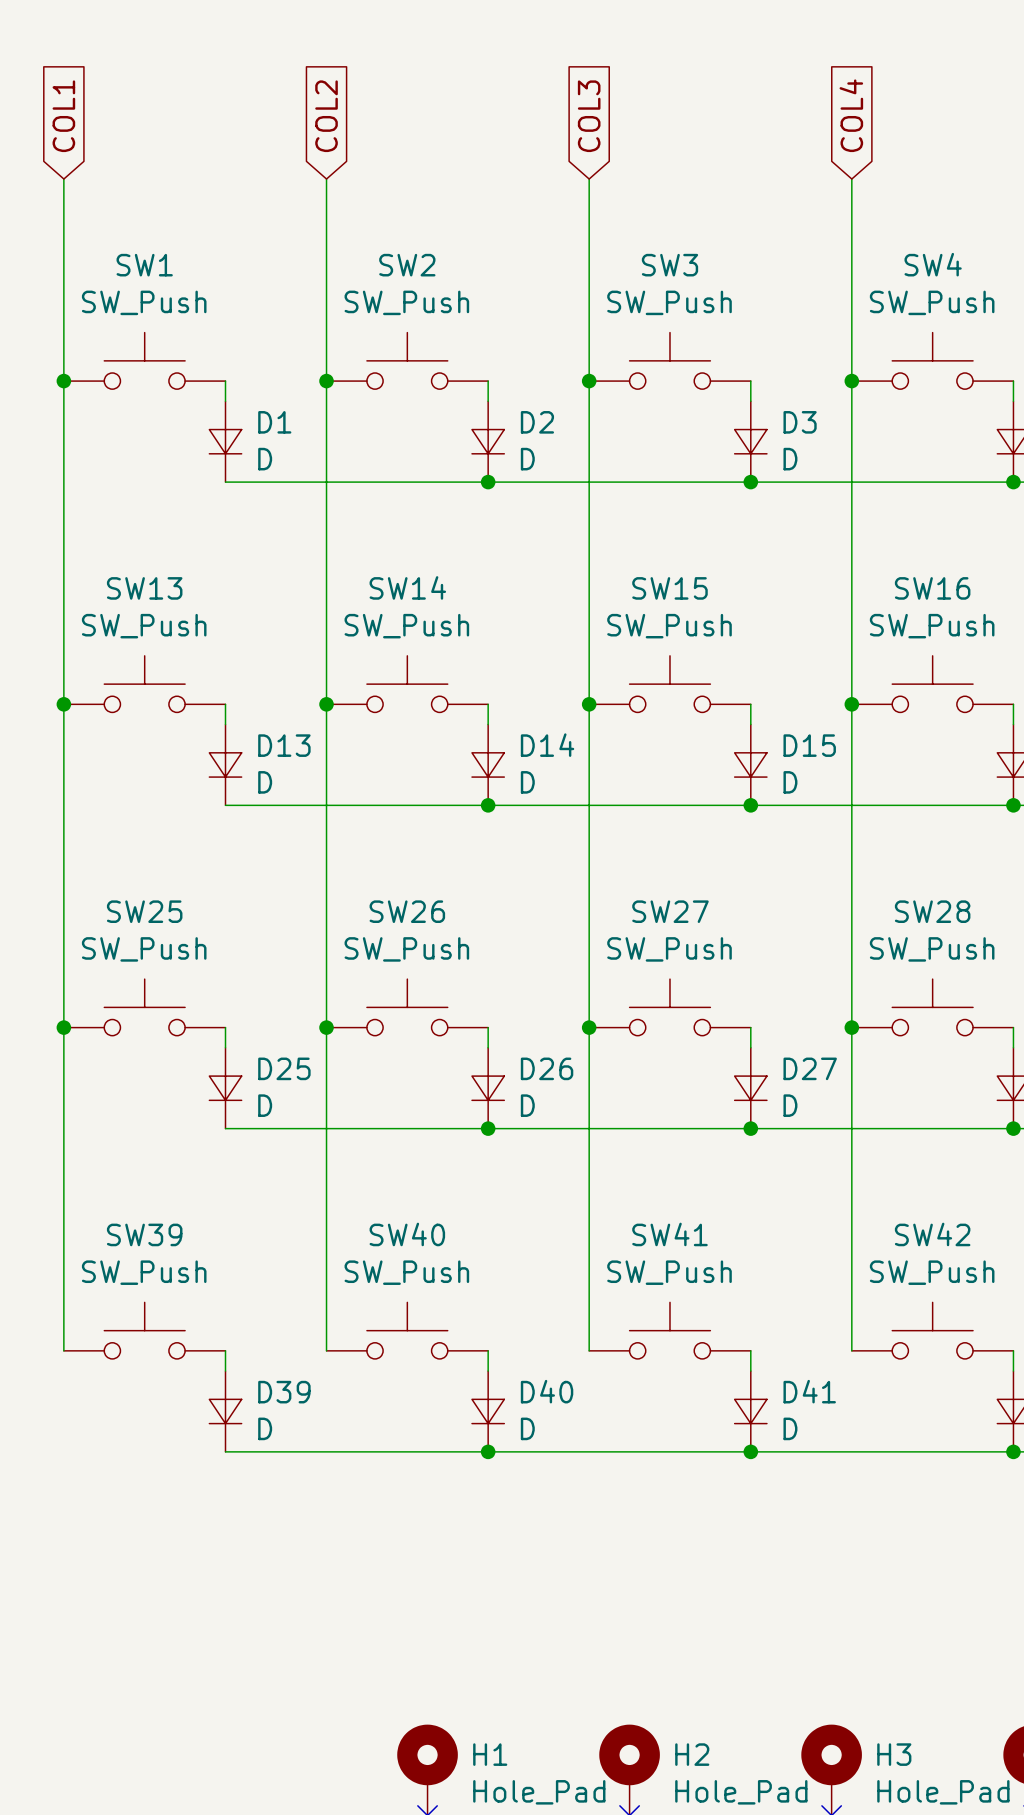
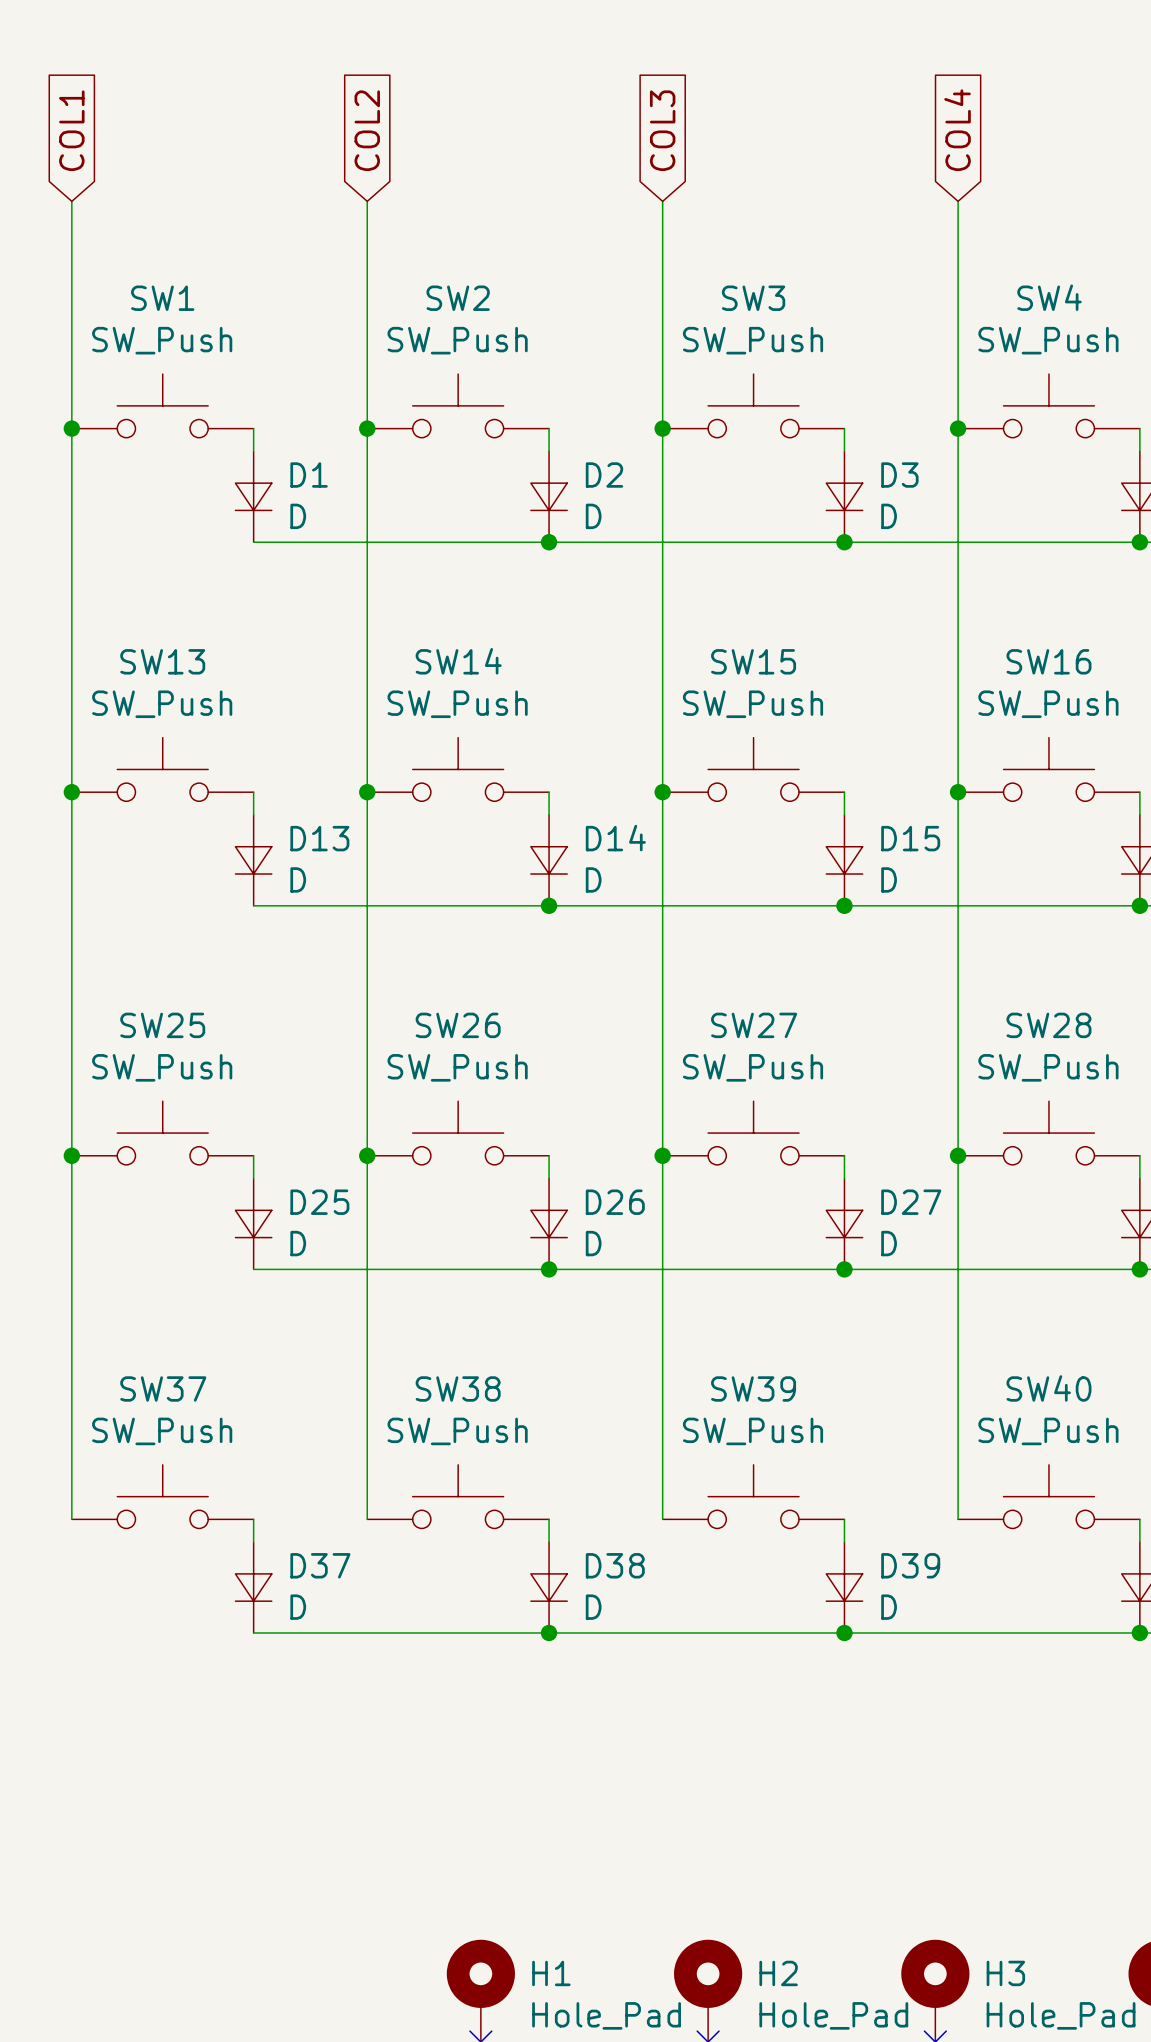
SW39 name: SW39 (144, 1234) -> SW37 (163, 1388)
SW40 name: SW40 (407, 1234) -> SW38 (458, 1388)
SW41 name: SW41 (669, 1234) -> SW39 (753, 1388)
SW42 name: SW42 (932, 1234) -> SW40 (1048, 1388)
D40 name: D40 (547, 1391) -> D38 (615, 1565)
D41 name: D41 (809, 1391) -> D39 (910, 1565)
D39 name: D39 (284, 1392) -> D37 (320, 1565)

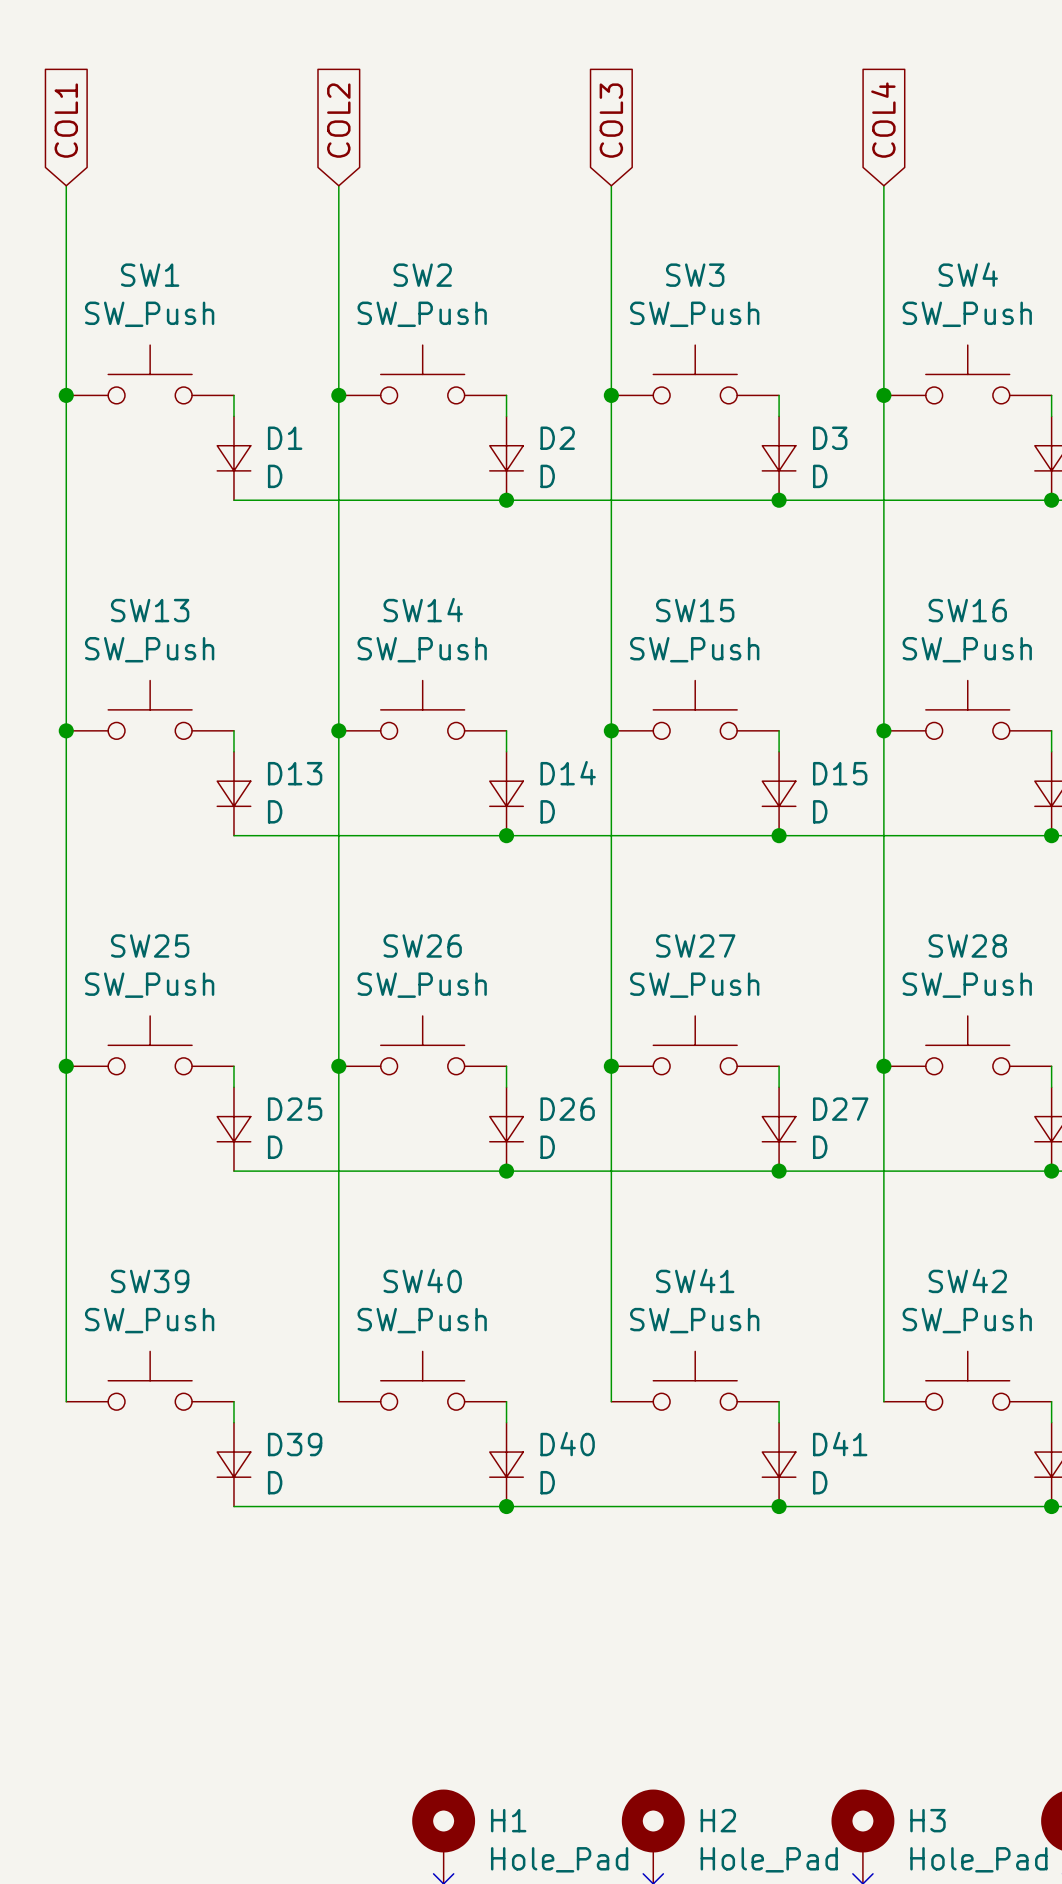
SW37 name: SW37 (163, 1388) -> SW39 (150, 1281)
SW38 name: SW38 (458, 1388) -> SW40 (422, 1280)
SW39 name: SW39 (753, 1388) -> SW41 (695, 1280)
SW40 name: SW40 (1048, 1388) -> SW42 (967, 1280)
D37 name: D37 (320, 1565) -> D39 (295, 1444)
D38 name: D38 (615, 1565) -> D40 (567, 1444)
D39 name: D39 (910, 1565) -> D41 (840, 1444)

